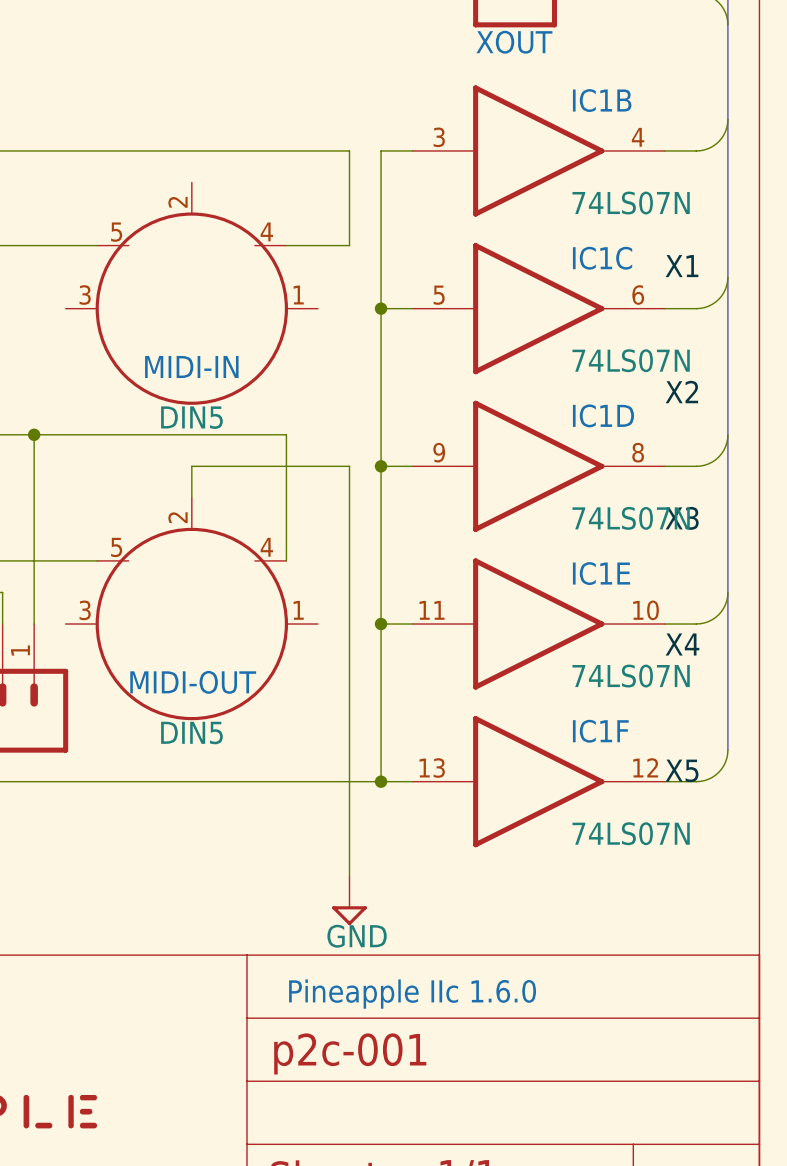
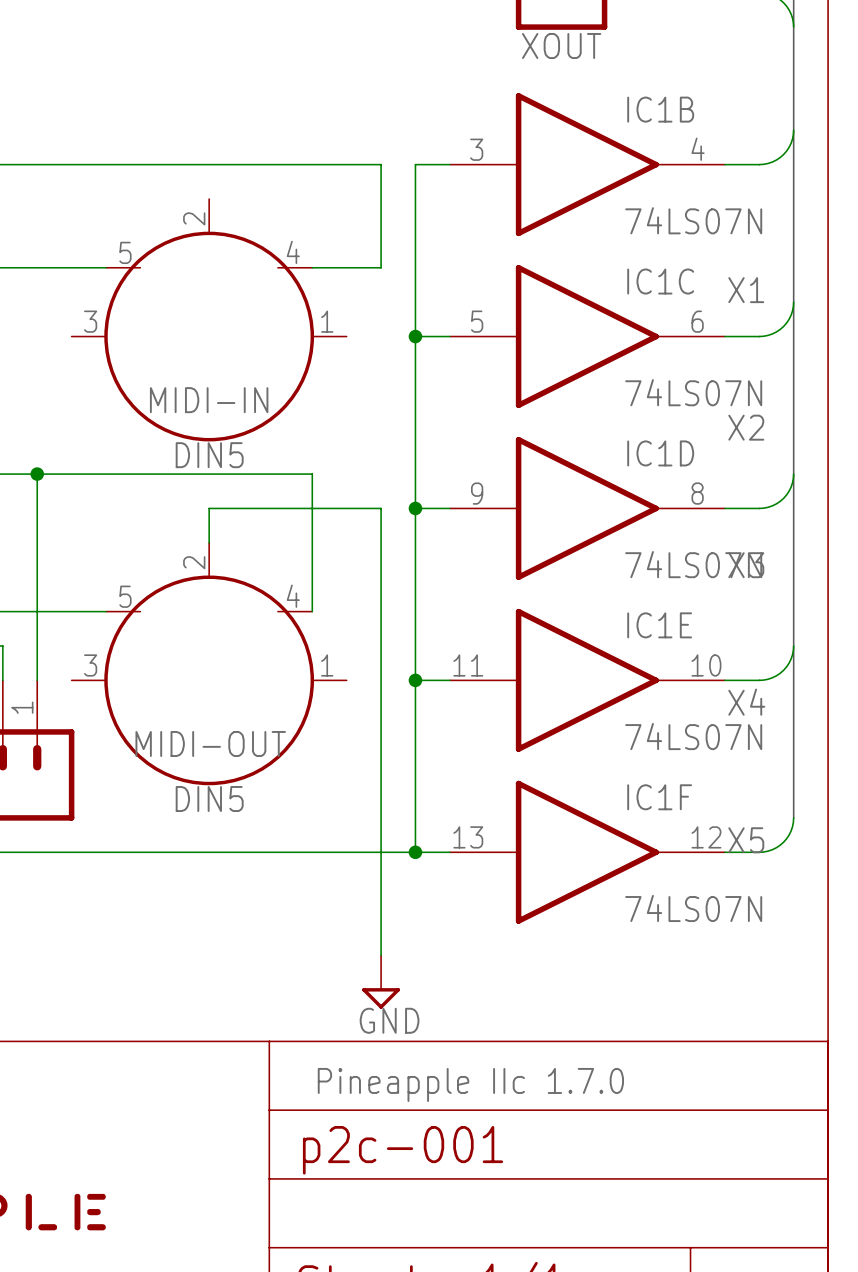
text: Pineapple IIc 1.6.0 (412, 994) -> Pineapple IIc 1.7.0 (470, 1084)

